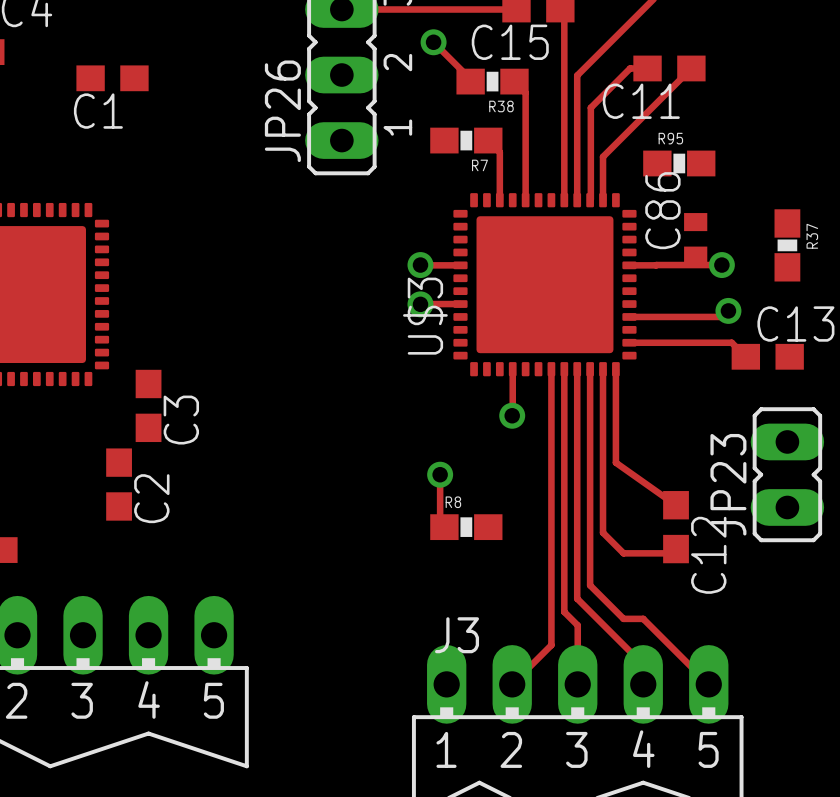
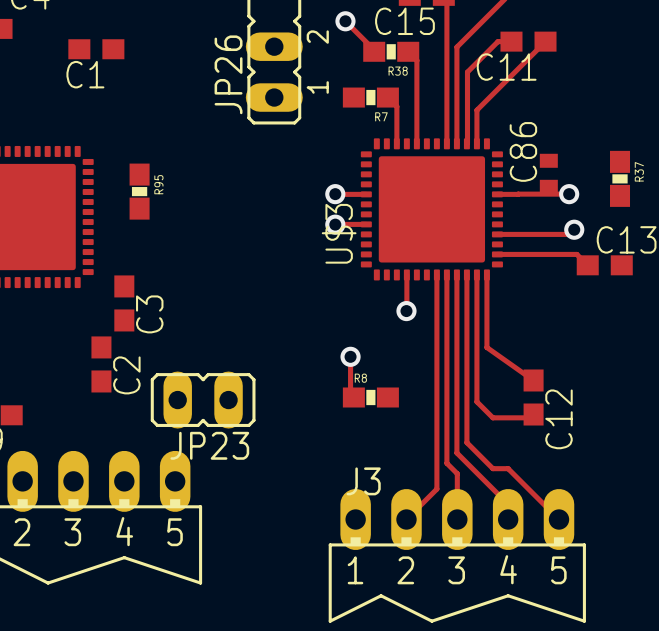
R95 rotation: 0° (679, 163) -> 90° clockwise (139, 191)
R95 position: (679, 163) -> (139, 191)
JP23 rotation: 0° (787, 474) -> 90° clockwise (203, 400)
JP23 position: (787, 474) -> (203, 400)
JP23 name position: JP23 (728, 484) -> JP23 (209, 445)

